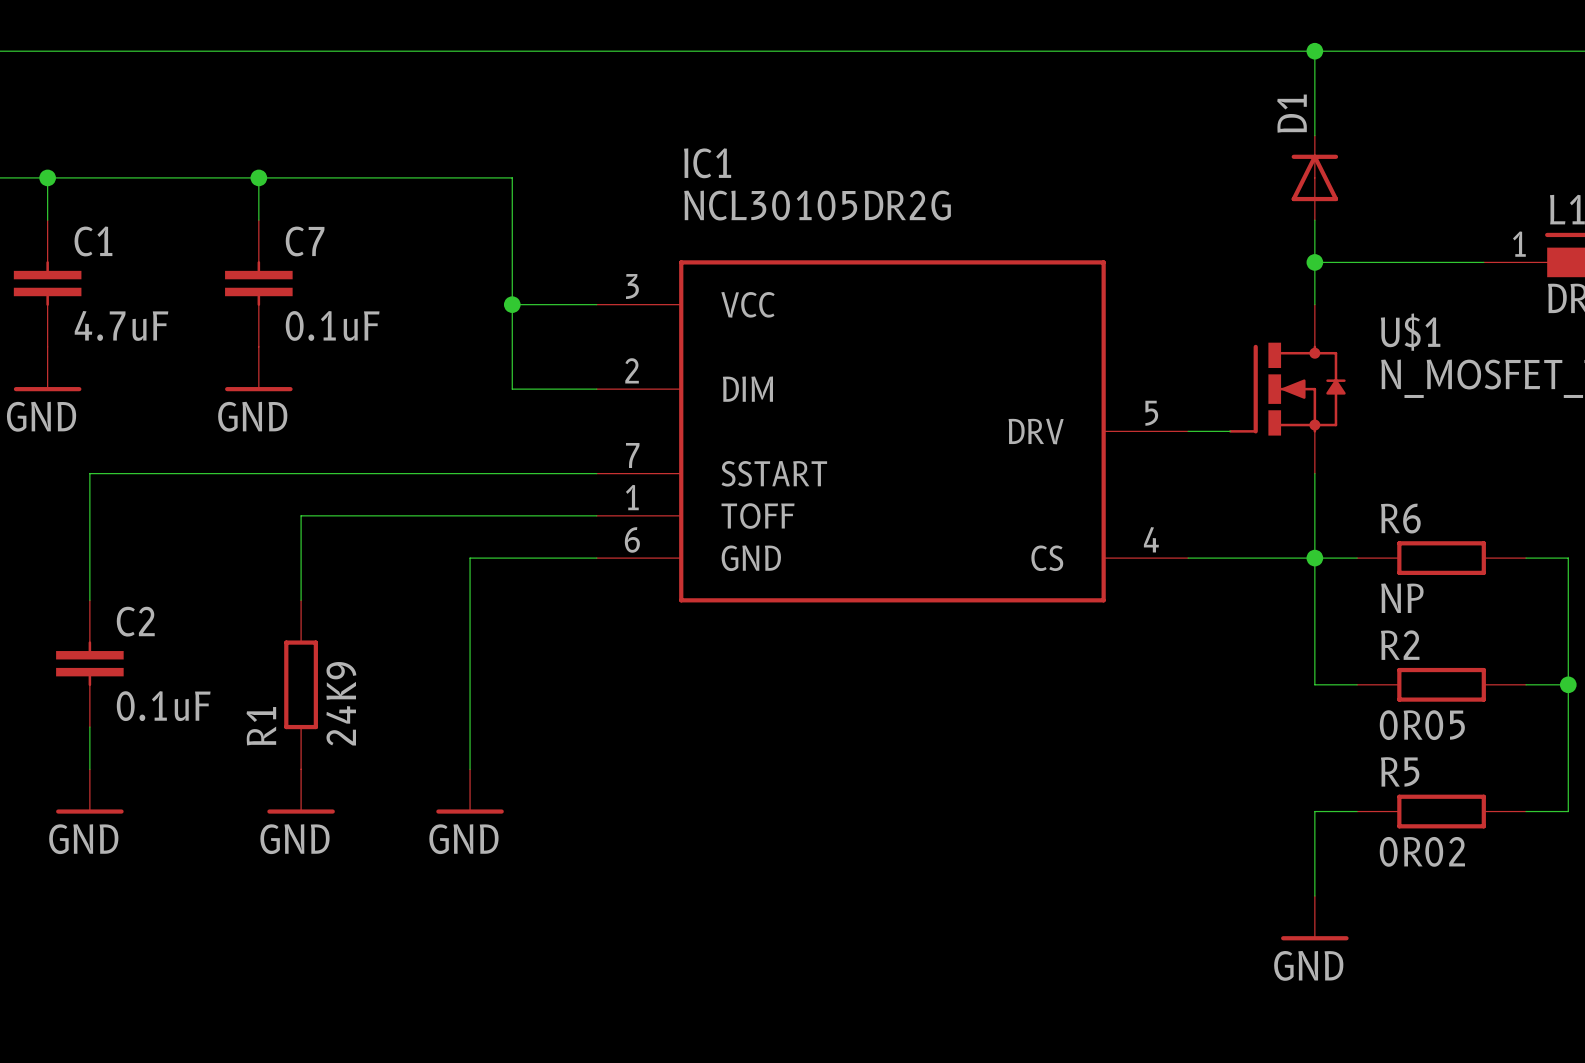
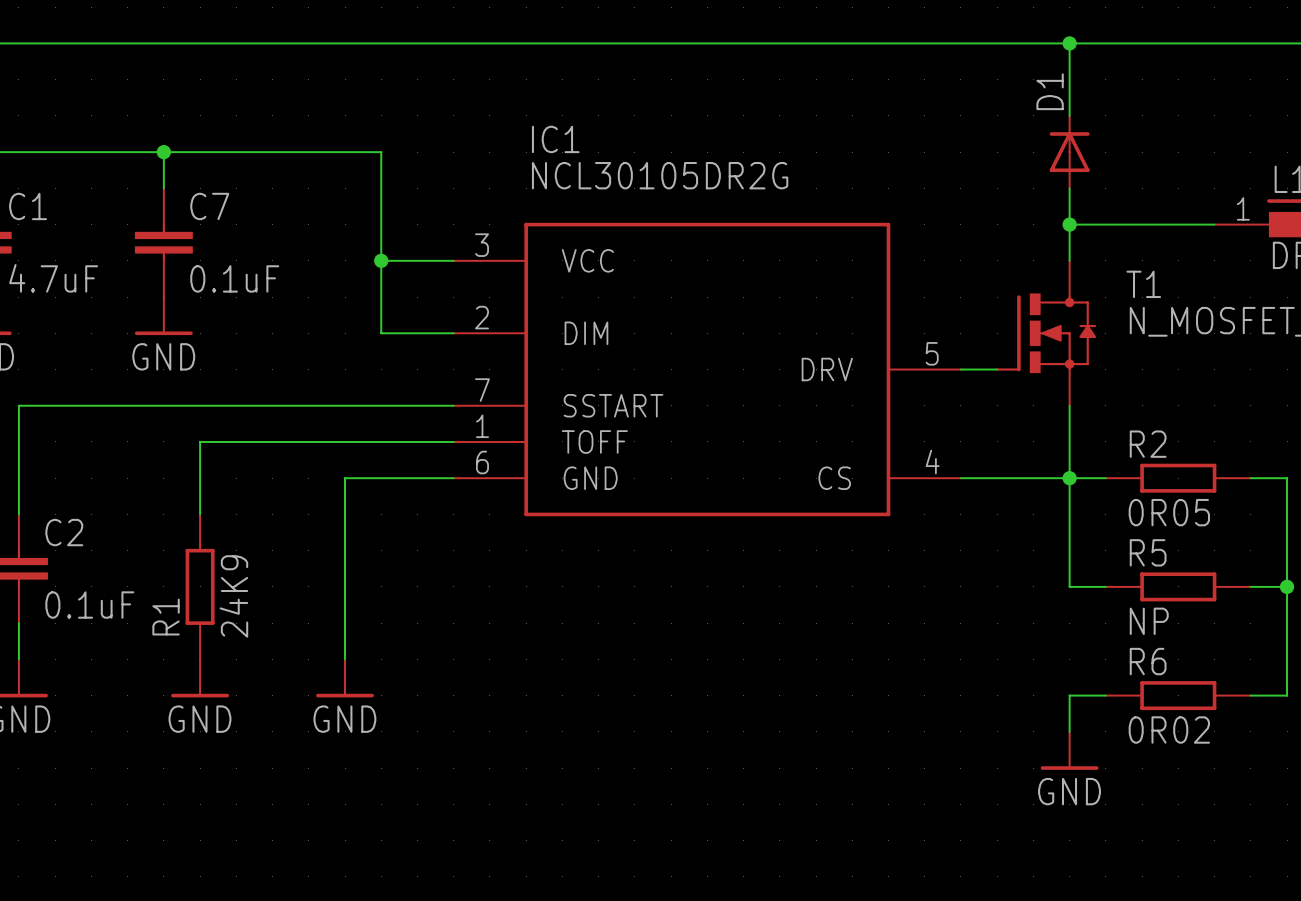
U$1 name: U$1 (1410, 332) -> T1 (1143, 284)
R6 name: R6 (1400, 518) -> R2 (1148, 444)
R6 value: NP (1402, 598) -> 0R05 (1169, 512)
R2 name: R2 (1400, 645) -> R5 (1148, 552)
R2 value: 0R05 (1422, 725) -> NP (1149, 621)
R5 name: R5 (1400, 771) -> R6 (1148, 661)
power symbol position: GND (1314, 918) -> GND (1069, 750)

